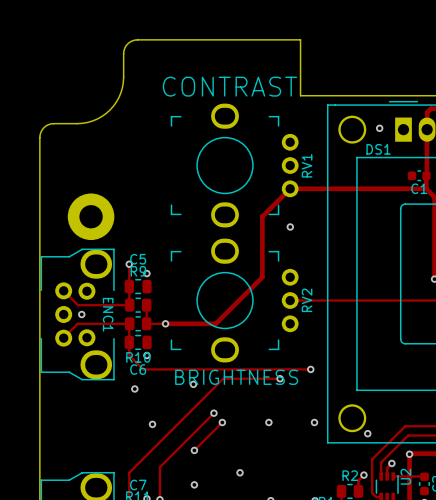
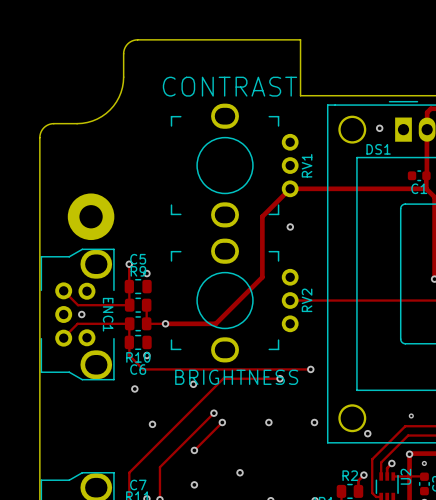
via: none -> (411, 415)
via: none -> (424, 463)

